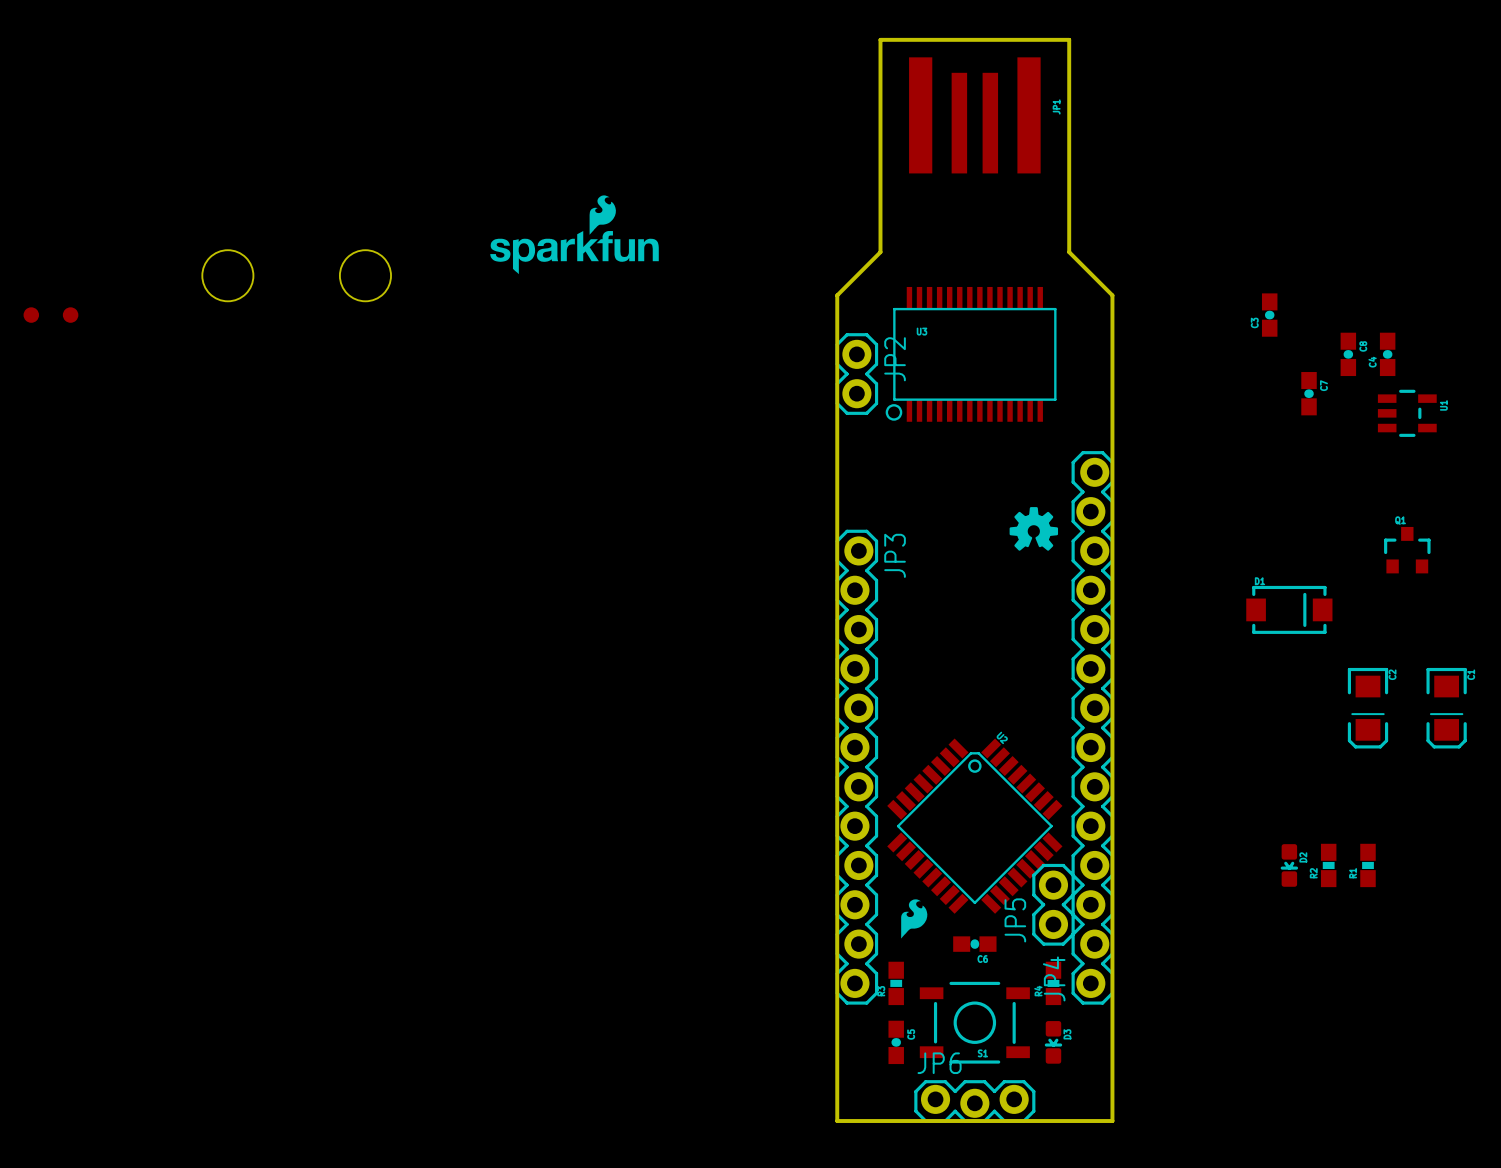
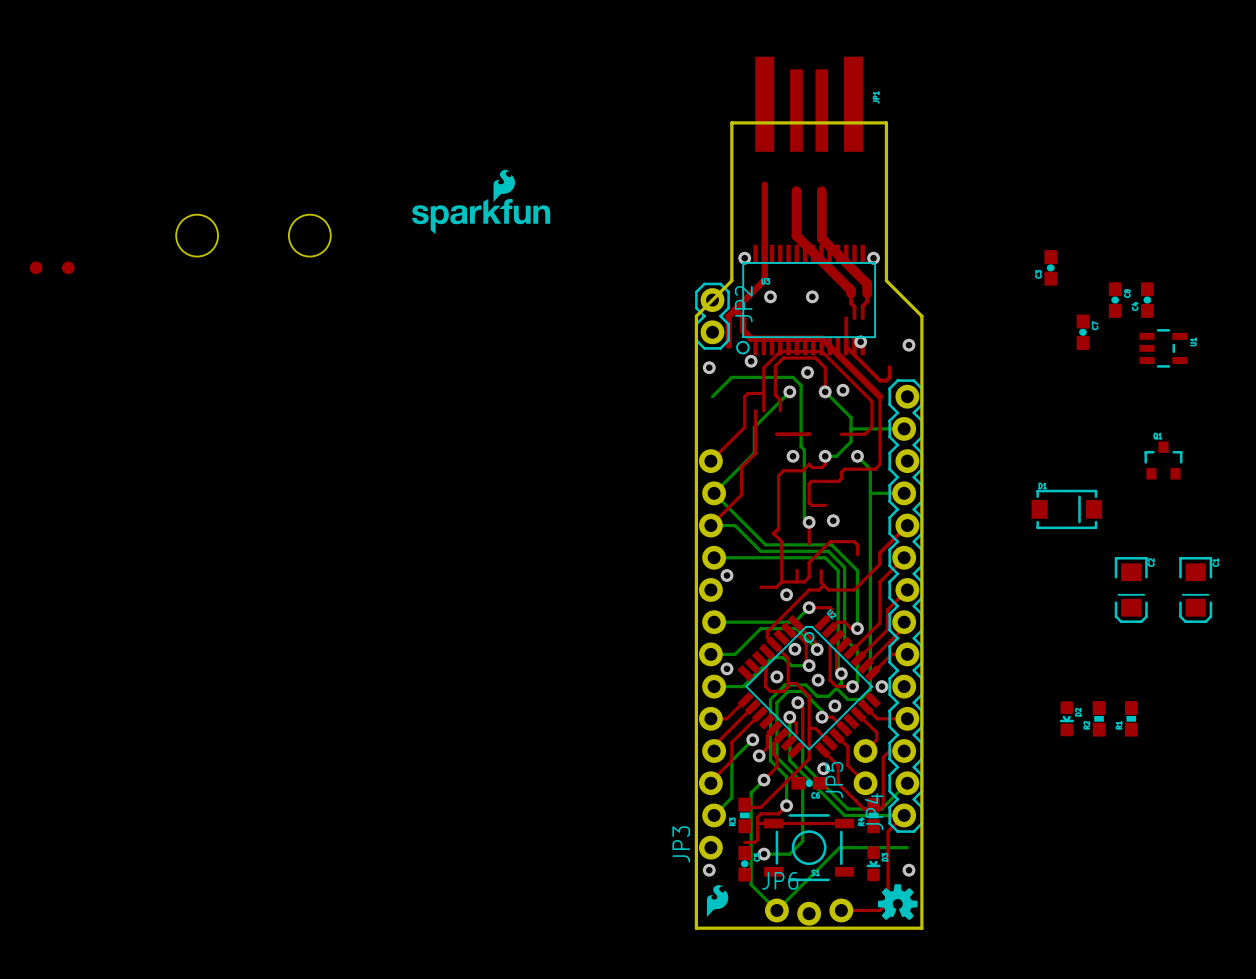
board edge: (880, 138) (880, 39) (1069, 39) (1069, 138) -> (731, 122) (886, 122)
top track: none -> (764, 184) (764, 280) (728, 316) (728, 345)
top track: none -> (796, 191) (796, 235) (851, 290) (851, 303) (854, 306) (854, 318)
top track: none -> (821, 191) (821, 238) (867, 283) (867, 301) (862, 306) (862, 318)
board edge: (880, 252) (837, 295) (837, 374) -> (731, 216) (731, 280) (696, 316)
board edge: (1069, 252) (1112, 295) (1112, 374) -> (886, 216) (886, 280) (921, 316)
via: none -> (744, 258)
via: none -> (873, 258)
via: none -> (770, 296)
via: none -> (812, 296)
top track: none -> (735, 309) (743, 317) (743, 330) (751, 338) (822, 338) (880, 396) (880, 464) (875, 469) (844, 469) (841, 472) (841, 478) (838, 481) (811, 481) (809, 483) (809, 503) (811, 505) (825, 505)
top track: none -> (846, 318) (846, 346) (880, 380) (886, 380) (889, 377) (889, 367)
via: none -> (860, 341)
via: none -> (908, 345)
via: none -> (751, 361)
via: none -> (709, 367)
via: none -> (807, 372)
via: none -> (842, 390)
bottom track: none -> (789, 391) (754, 427) (754, 453) (714, 493) (765, 544) (831, 544) (857, 570) (857, 628)
via: none -> (789, 391)
bottom track: none -> (825, 391) (851, 417) (851, 441) (836, 456) (825, 456)
top track: none -> (825, 391) (825, 367) (815, 358) (783, 358) (775, 366) (775, 395) (780, 400) (780, 410)
via: none -> (825, 391)
top track: none -> (763, 393) (747, 393) (744, 396) (744, 427) (710, 461)
bottom track: none -> (712, 396) (731, 377) (793, 377) (801, 385) (801, 446) (804, 449) (804, 517) (809, 522)
top track: none -> (755, 410) (755, 453) (741, 467) (741, 494) (710, 525)
top track: none -> (763, 410) (763, 367) (780, 351) (822, 351) (871, 401) (871, 427) (865, 434) (841, 434)
drawing: [1009, 507, 1059, 551] -> none
bottom track: none -> (851, 428) (904, 428)
top track: none -> (809, 433) (776, 434)
JP3 footprint: [835, 529, 879, 1005] -> [698, 449, 727, 860]
via: none -> (793, 456)
top track: none -> (825, 456) (825, 464) (822, 467) (812, 467) (809, 464) (802, 470) (783, 470) (778, 475) (778, 528) (773, 533) (781, 541) (781, 581)
via: none -> (825, 456)
bottom track: none -> (857, 456) (870, 469) (870, 689) (860, 699) (847, 699) (836, 688)
via: none -> (857, 456)
JP3 name position: JP3 (895, 555) -> JP3 (681, 844)
bottom track: none -> (870, 493) (904, 493)
via: none -> (833, 520)
top track: none -> (809, 522) (809, 543)
via: none -> (809, 522)
bottom track: none -> (710, 525) (735, 525) (760, 551) (828, 551) (844, 567) (844, 638) (857, 651) (857, 681) (852, 686)
top track: none -> (907, 525) (880, 552) (880, 564) (854, 589) (828, 589) (821, 582) (821, 570)
top track: none -> (857, 554) (857, 544) (854, 541) (830, 541) (809, 562) (809, 577) (804, 581) (781, 581)
bottom track: none -> (714, 557) (825, 557) (838, 570) (838, 670) (841, 673) (841, 683) (828, 696) (817, 696) (805, 684) (784, 684) (770, 699) (770, 760) (786, 776) (786, 805)
top track: none -> (904, 557) (880, 581) (880, 622) (851, 651)
top track: none -> (797, 570) (796, 581)
via: none -> (726, 575)
top track: none -> (781, 581) (776, 587) (760, 587)
top track: none -> (823, 585) (818, 589) (809, 589) (767, 631) (767, 637) (788, 658) (788, 686) (783, 691) (770, 691) (765, 686) (766, 665) (759, 658)
top track: none -> (907, 589) (887, 609) (887, 629) (858, 658)
via: none -> (786, 594)
bottom track: none -> (809, 607) (794, 622) (714, 622)
top track: none -> (809, 607) (831, 609) (831, 613) (822, 623)
via: none -> (809, 607)
top track: none -> (904, 622) (904, 627) (865, 666)
top track: none -> (795, 623) (817, 644) (817, 649)
top track: none -> (857, 628) (851, 628) (844, 622) (837, 622) (829, 630)
via: none -> (857, 628)
top track: none -> (788, 630) (806, 643) (806, 662) (809, 665)
top track: none -> (836, 637) (830, 644) (830, 680) (836, 686) (852, 686)
top track: none -> (844, 644) (836, 652) (836, 668) (841, 673)
via: none -> (794, 649)
bottom track: none -> (817, 649) (796, 628) (760, 628) (735, 654) (710, 654)
via: none -> (817, 649)
top track: none -> (907, 654) (891, 654) (872, 673)
bottom track: none -> (809, 665) (791, 665) (783, 657) (772, 657) (743, 686) (714, 686)
via: none -> (809, 665)
via: none -> (726, 668)
via: none -> (841, 673)
via: none -> (776, 676)
via: none -> (818, 680)
top track: none -> (788, 683) (796, 683) (809, 696) (809, 759) (760, 807) (744, 807)
via: none -> (852, 686)
via: none -> (881, 686)
top track: none -> (745, 699) (726, 718) (710, 718)
bottom track: none -> (797, 702) (802, 707) (802, 763) (847, 809) (881, 809) (907, 783)
top track: none -> (797, 702) (802, 707) (802, 742) (795, 750)
via: none -> (797, 702)
via: none -> (834, 705)
top track: none -> (752, 707) (714, 745) (714, 751)
top track: none -> (865, 707) (877, 718) (907, 718)
top track: none -> (759, 714) (731, 742) (731, 760) (710, 783)
top track: none -> (858, 714) (876, 732) (876, 739) (865, 751)
bottom track: none -> (789, 717) (789, 760) (844, 815) (904, 815)
top track: none -> (789, 717) (796, 723) (796, 734) (788, 743)
via: none -> (789, 717)
bottom track: none -> (822, 717) (822, 710) (802, 691) (788, 691) (776, 702) (776, 757) (802, 783) (802, 841) (789, 854) (764, 854)
top track: none -> (822, 717) (832, 717) (844, 728)
via: none -> (822, 717)
JP5 footprint: [1032, 863, 1075, 946] -> [853, 739, 878, 796]
top track: none -> (774, 728) (767, 735) (767, 747) (759, 755)
top track: none -> (809, 728) (815, 728) (829, 743)
top track: none -> (781, 735) (773, 743) (776, 767) (764, 780)
top track: none -> (836, 735) (847, 746) (847, 765) (865, 783)
bottom track: none -> (752, 739) (731, 760) (731, 797) (714, 815)
via: none -> (752, 739)
top track: none -> (822, 750) (838, 765) (838, 783) (863, 809) (880, 809) (883, 805) (883, 757) (889, 751) (904, 751)
via: none -> (759, 755)
drawing position: (914, 919) -> (717, 901)
via: none -> (823, 768)
bottom track: none -> (764, 780) (751, 792) (751, 884) (776, 910) (839, 847) (907, 847)
via: none -> (764, 780)
top track: none -> (786, 805) (778, 813) (760, 813) (757, 817) (757, 839) (754, 842) (744, 842)
via: none -> (786, 805)
top track: none -> (904, 815) (888, 831) (888, 902) (880, 910) (841, 910)
top track: none -> (757, 823) (844, 823)
via: none -> (764, 854)
via: none -> (709, 870)
via: none -> (908, 870)
drawing: none -> [877, 884, 918, 920]
JP6 footprint: [914, 1080, 1036, 1123] -> [765, 898, 854, 926]

